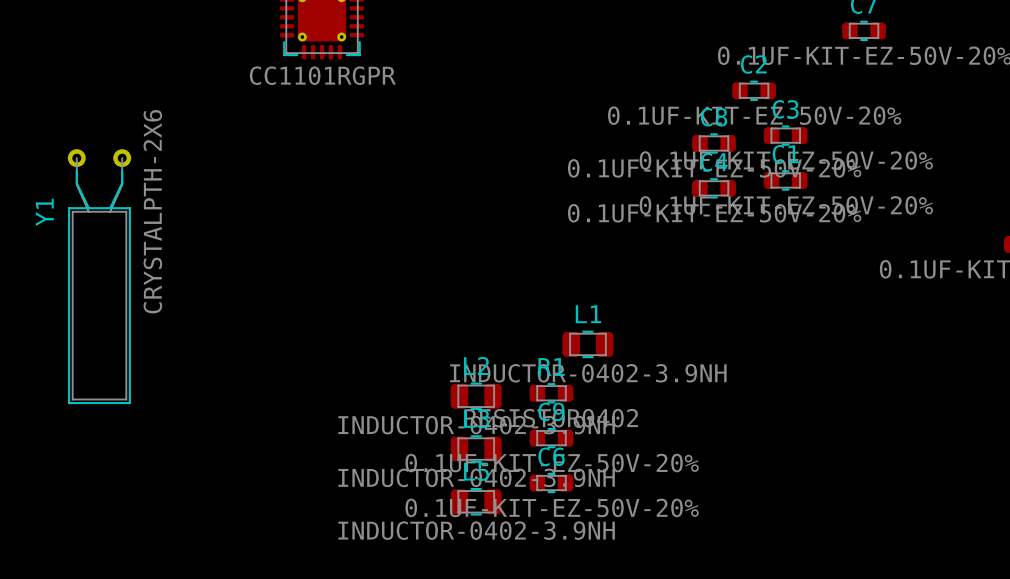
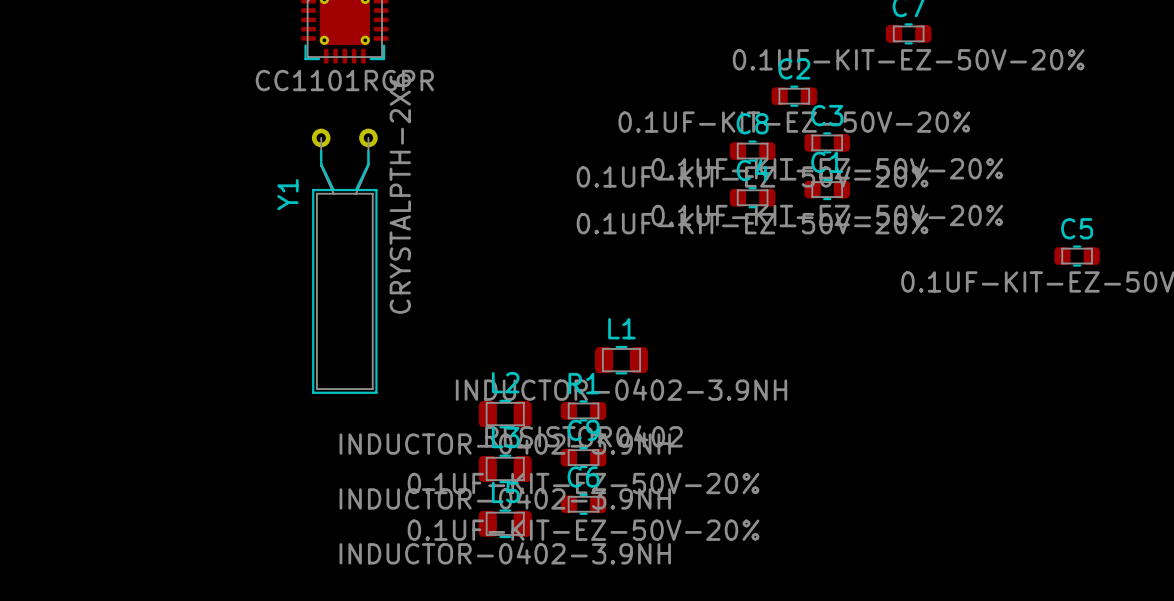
Y1 position: (99, 276) -> (344, 261)

